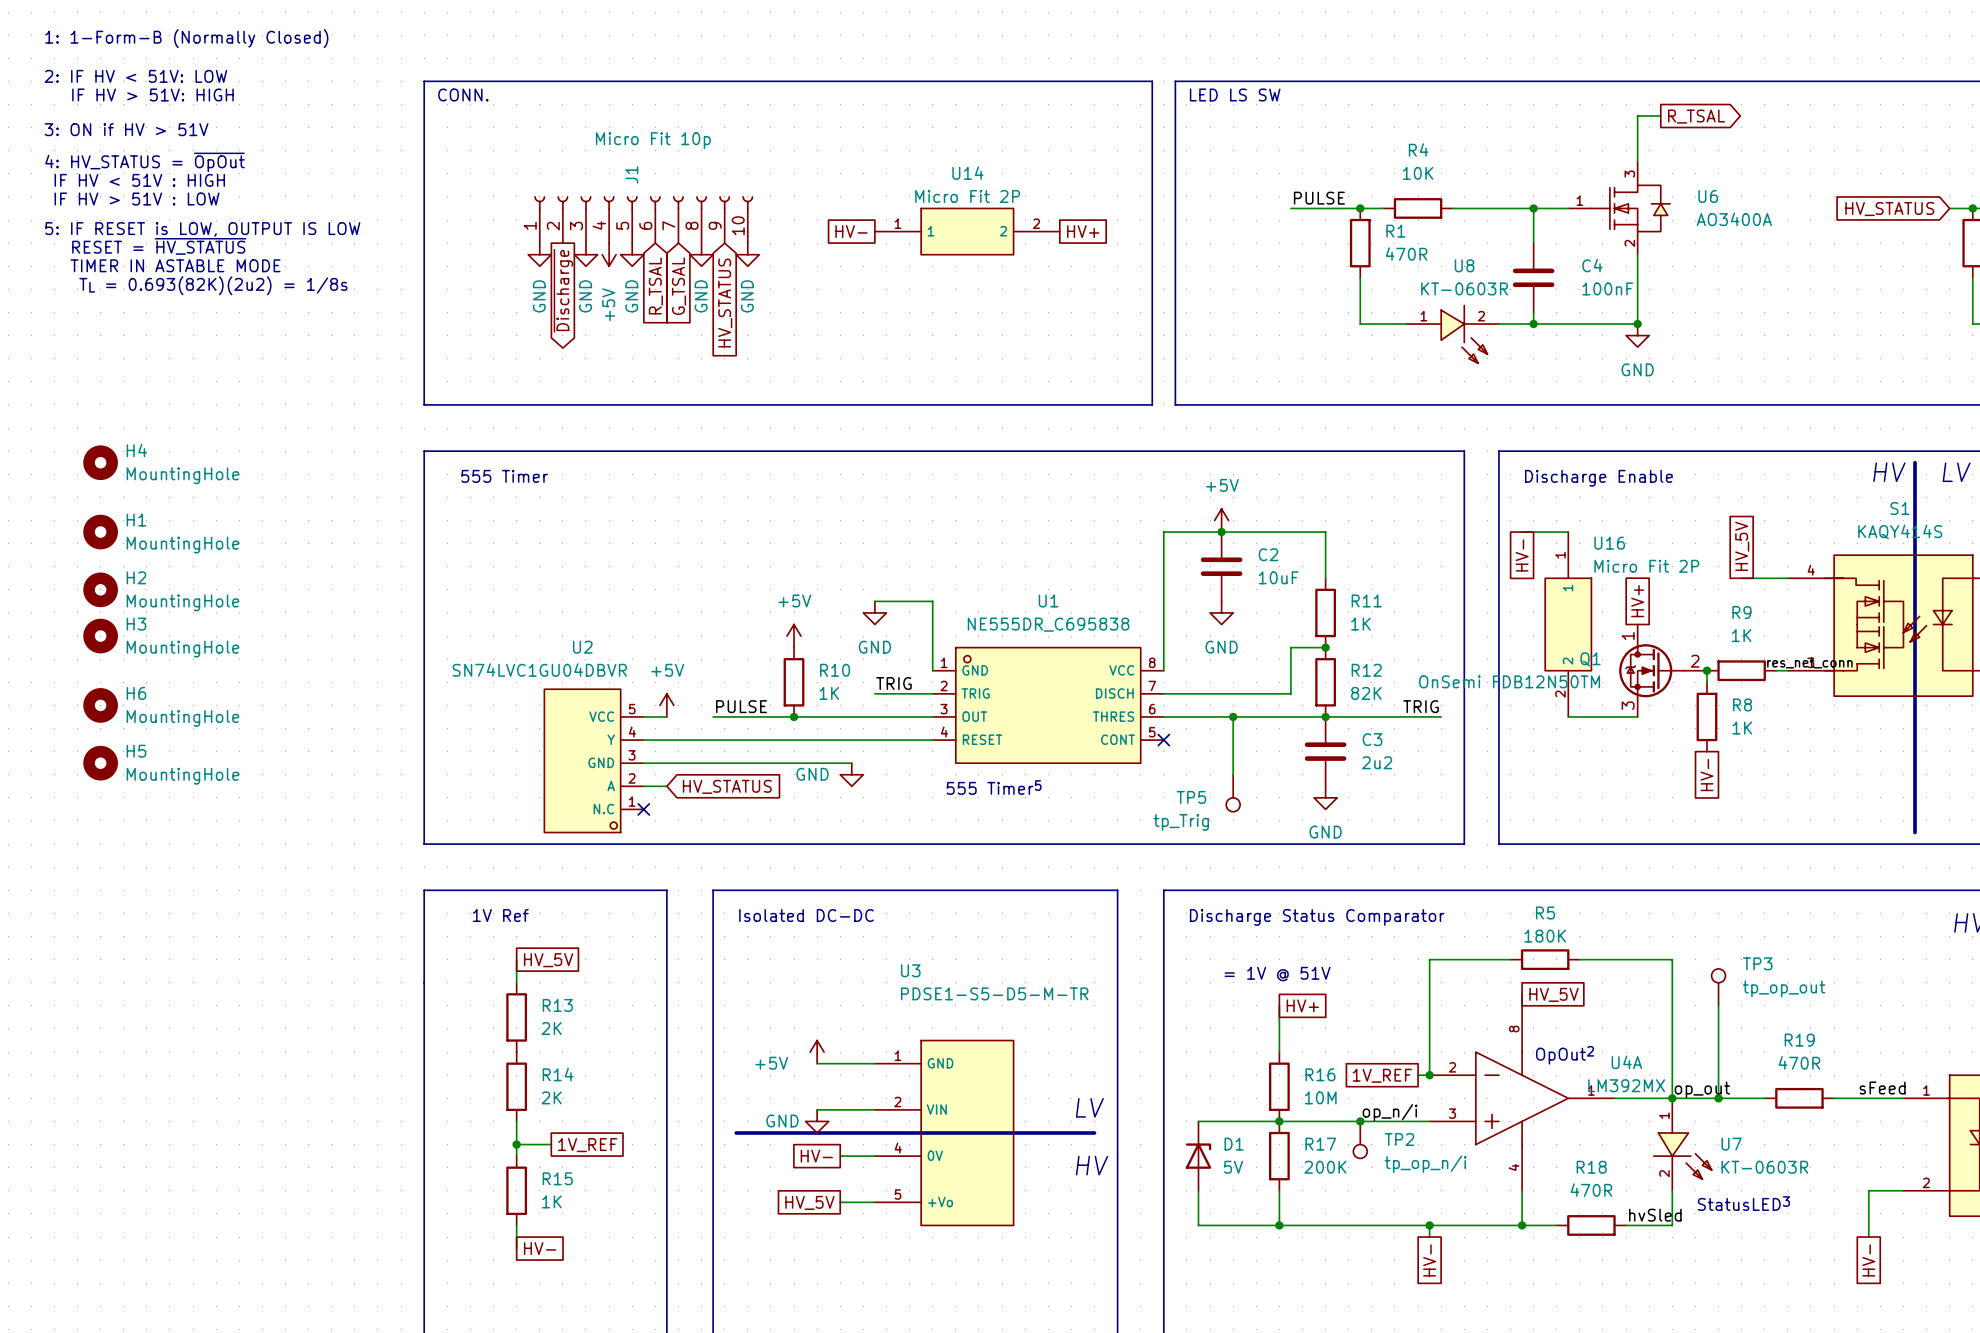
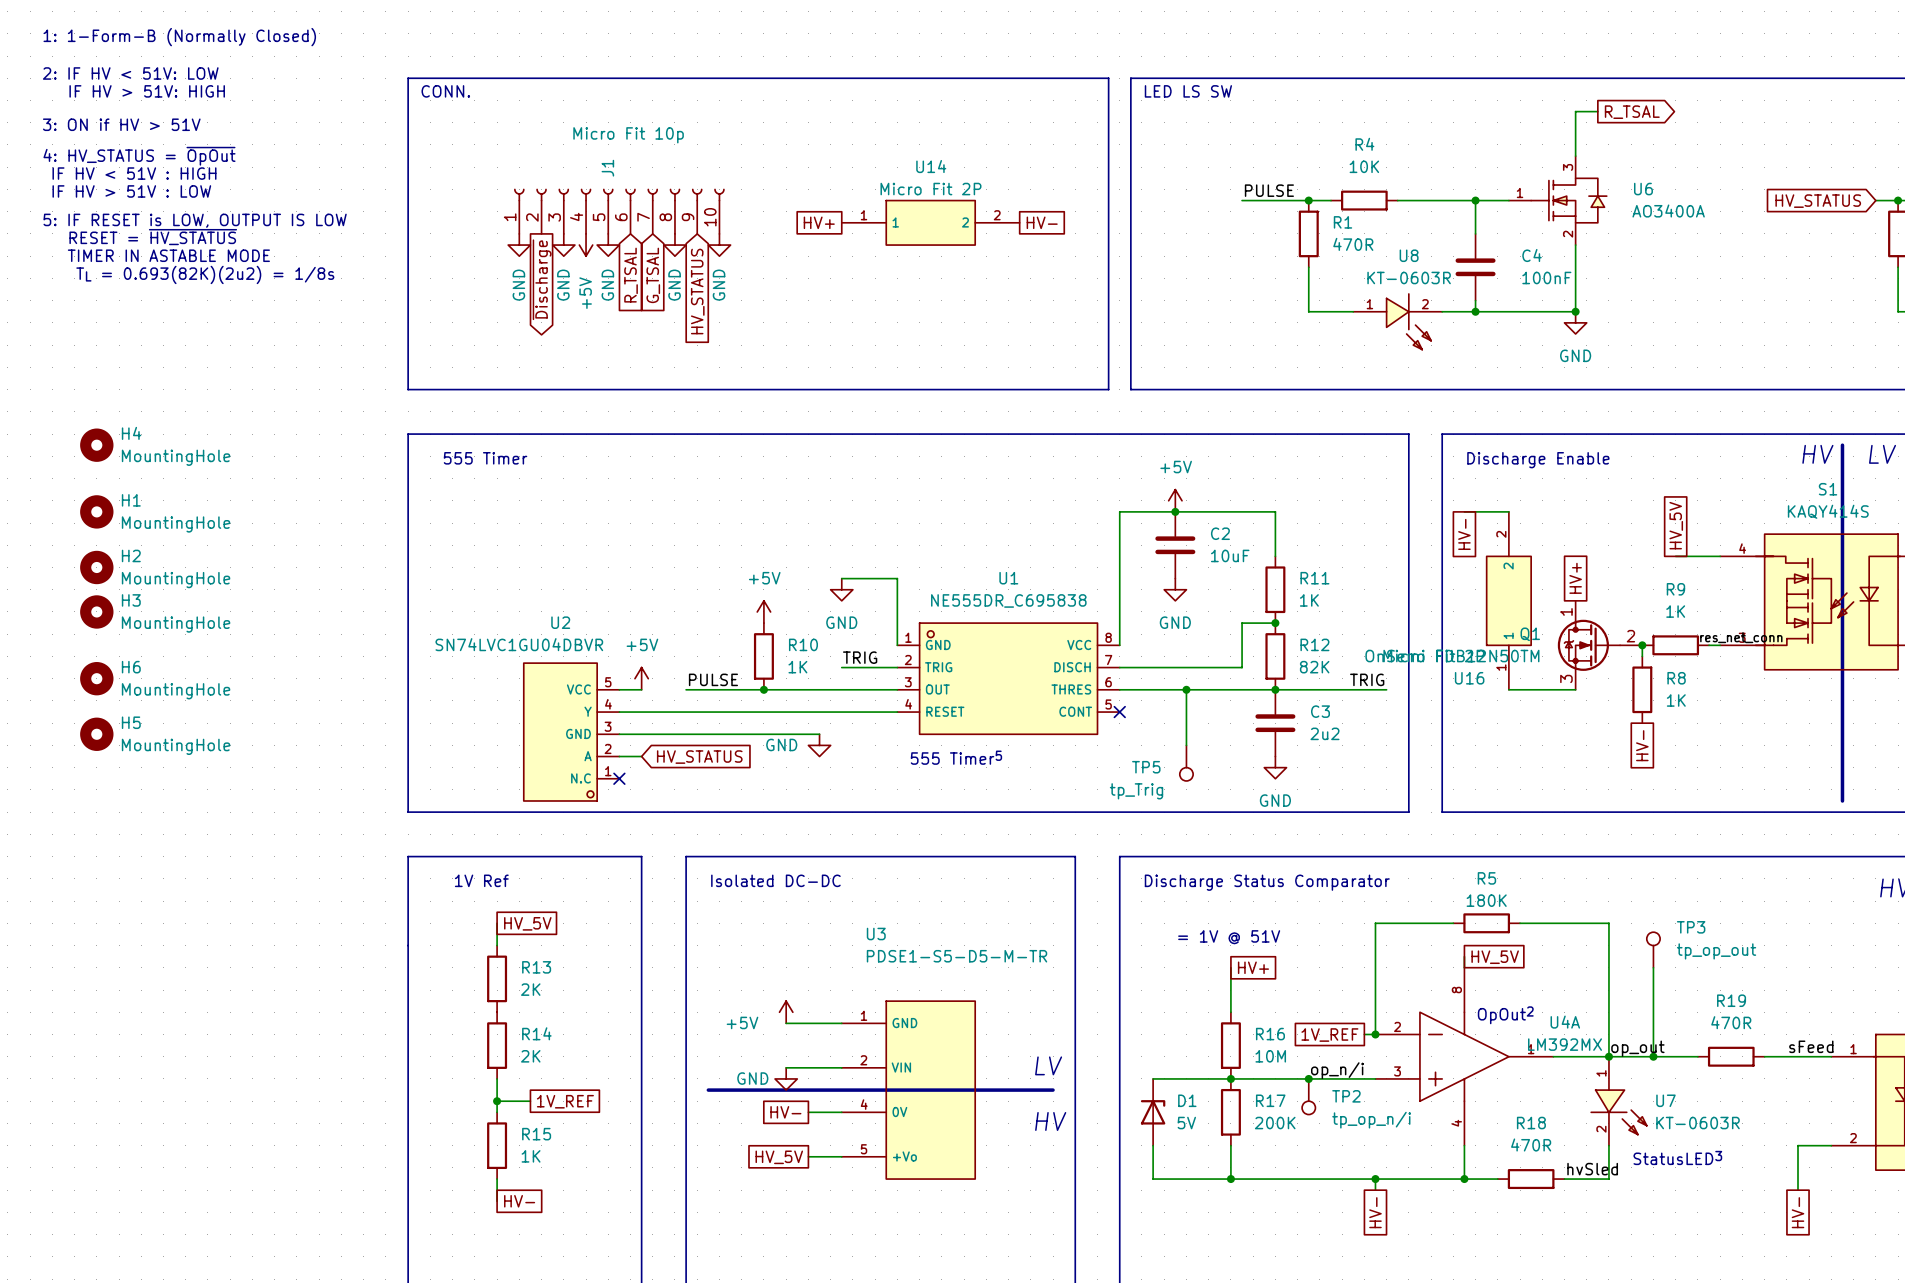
global label: HV- (851, 231) -> HV+ (819, 222)
global label: HV+ (1083, 231) -> HV- (1042, 222)
U16 rotation: 0° (1568, 624) -> 180° (1508, 600)

